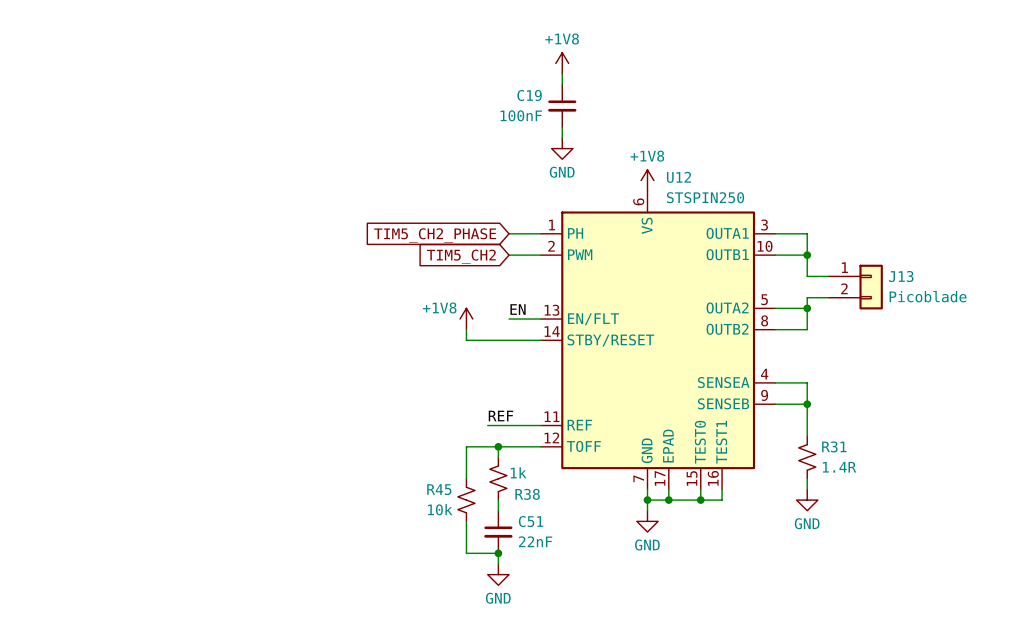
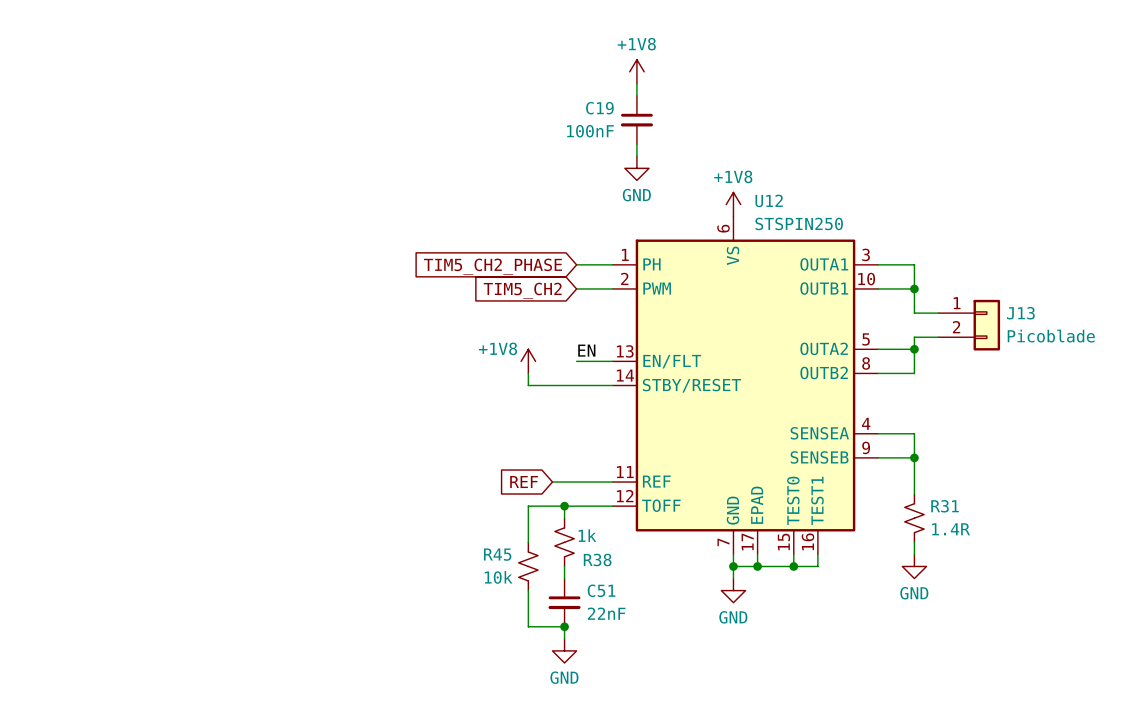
label: REF (501, 416) -> none
global label: none -> REF (524, 482)

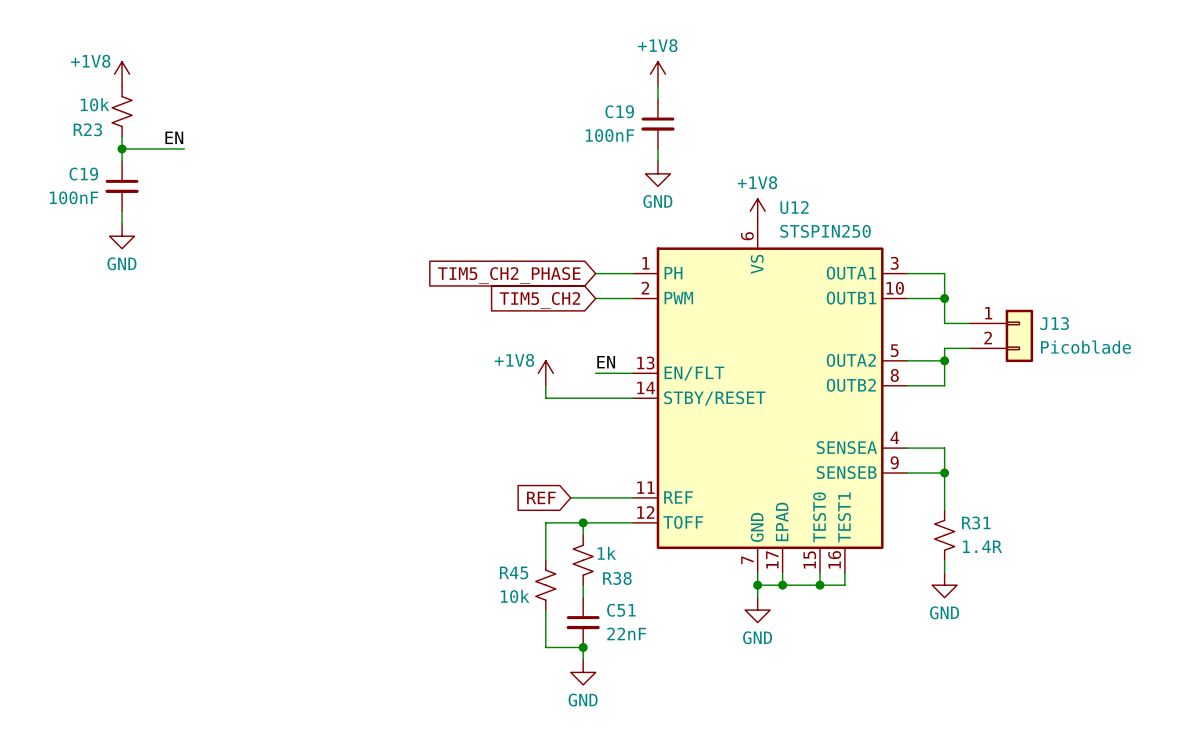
power symbol: none -> +1V8 (122, 74)
R23: none -> 10k (122, 111)
wire: none -> (122, 136) (122, 161)
label: none -> EN (174, 137)
wire: none -> (122, 148) (184, 148)
junction: none -> (122, 148)
C19: none -> 100nF (122, 186)
wire: none -> (122, 211) (122, 223)
power symbol: none -> GND (122, 236)

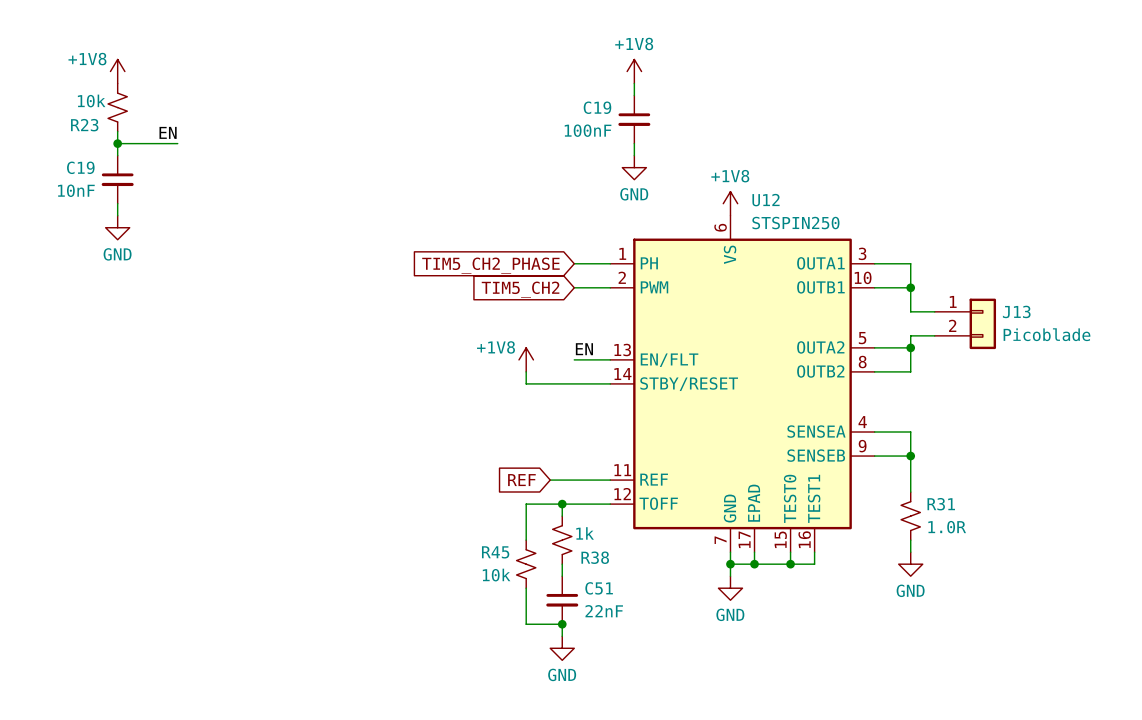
C19 value: 100nF (74, 197) -> 10nF (76, 190)
R31 value: 1.4R (982, 546) -> 1.0R (947, 527)

